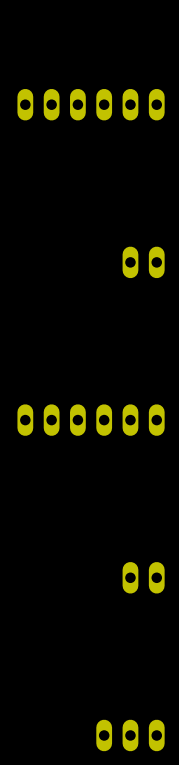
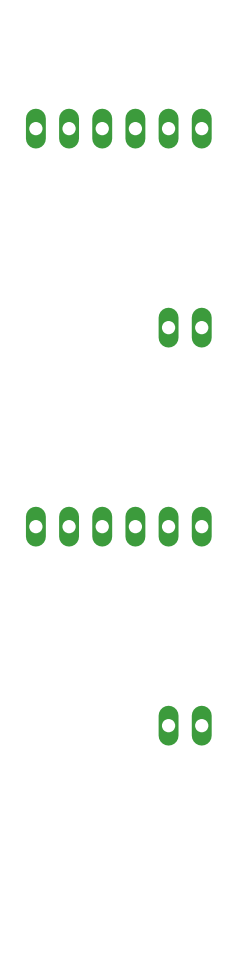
part: (130, 735) -> none

